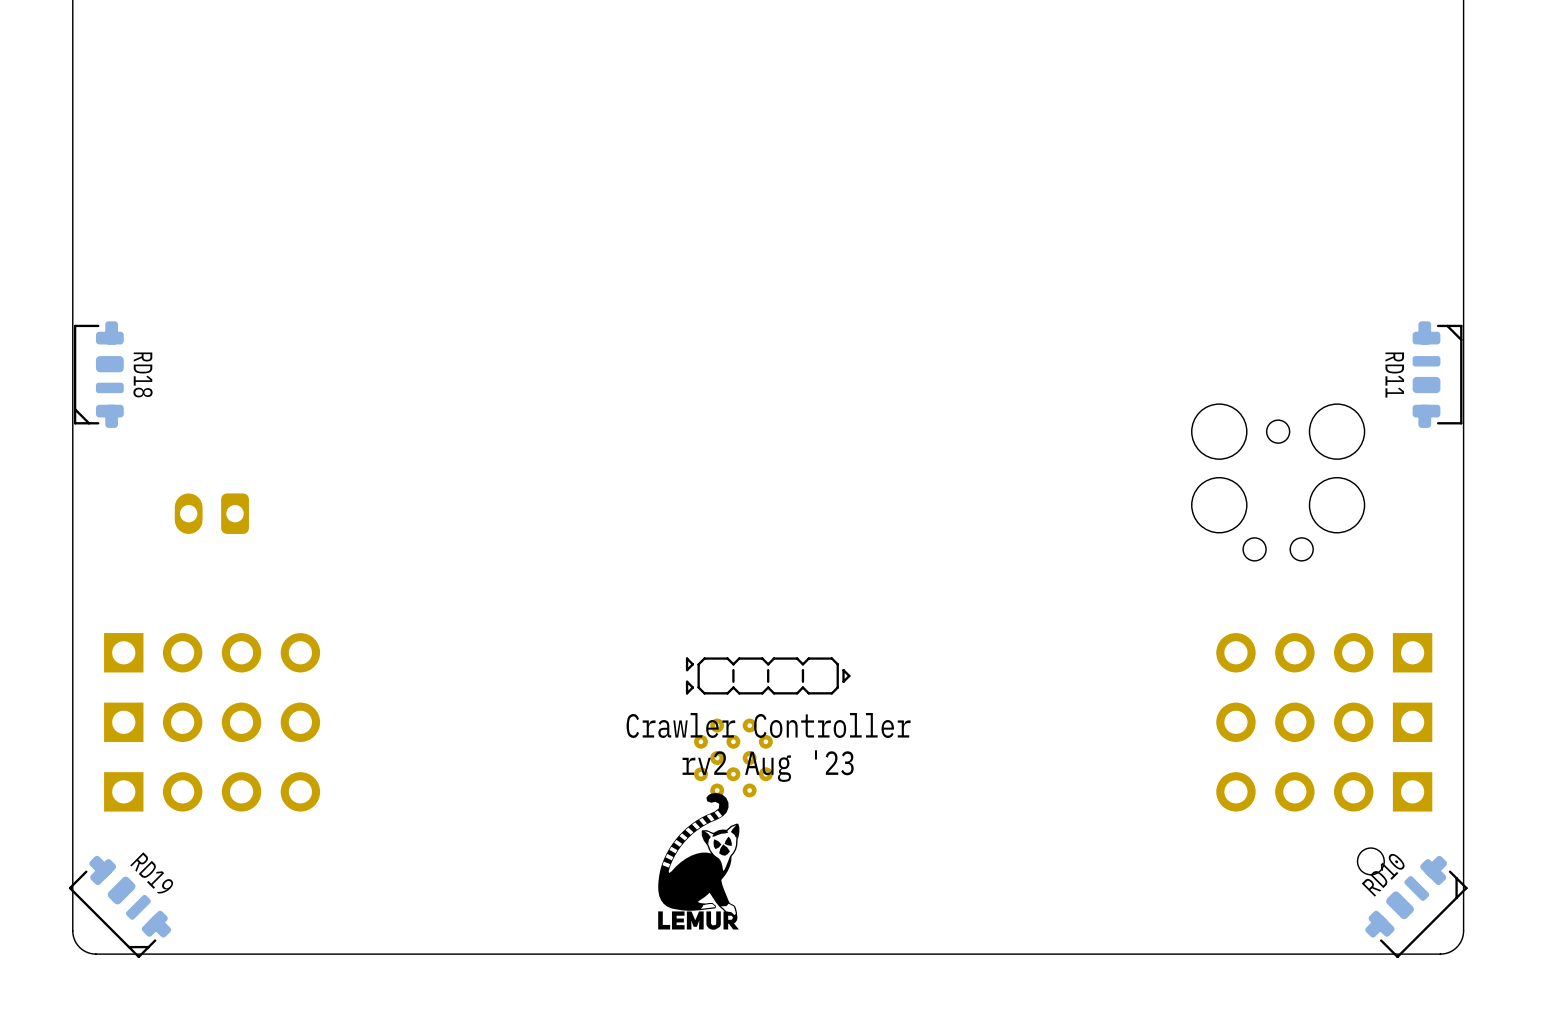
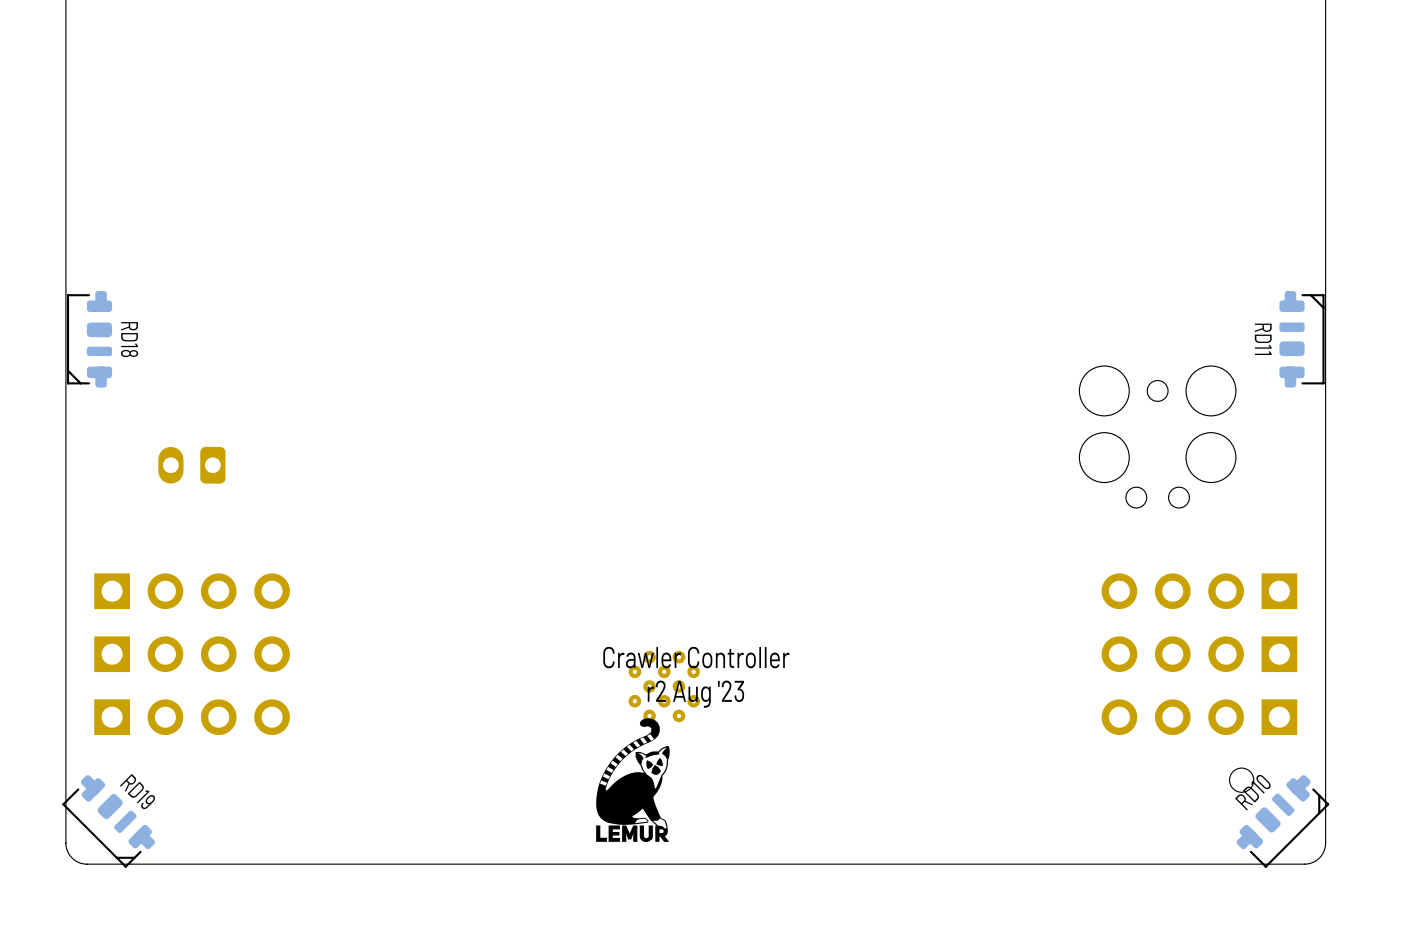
drawing: [685, 657, 851, 695] -> none
text: rv2 Aug '23 (768, 766) -> r2 Aug '23 (695, 694)

